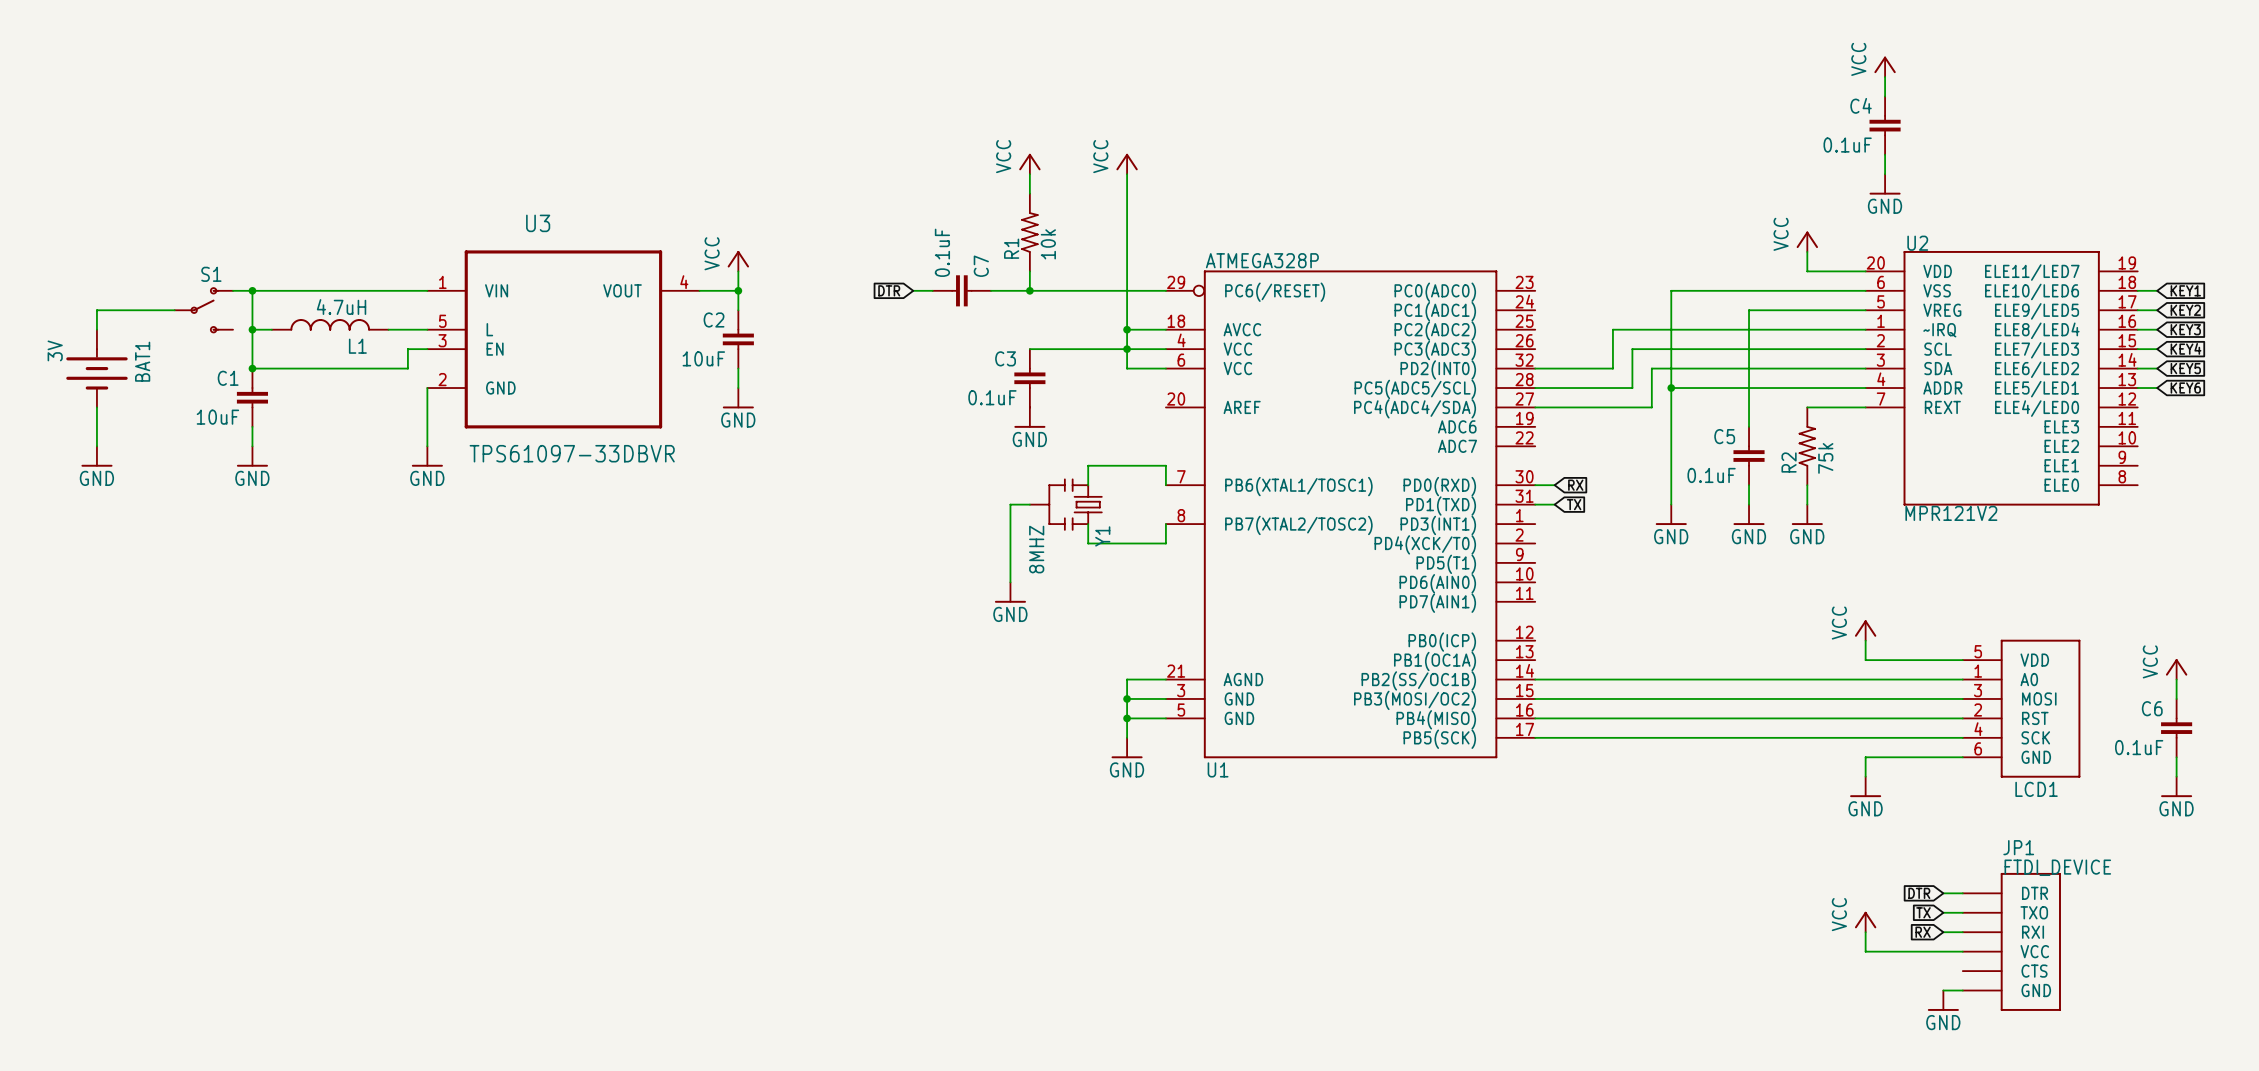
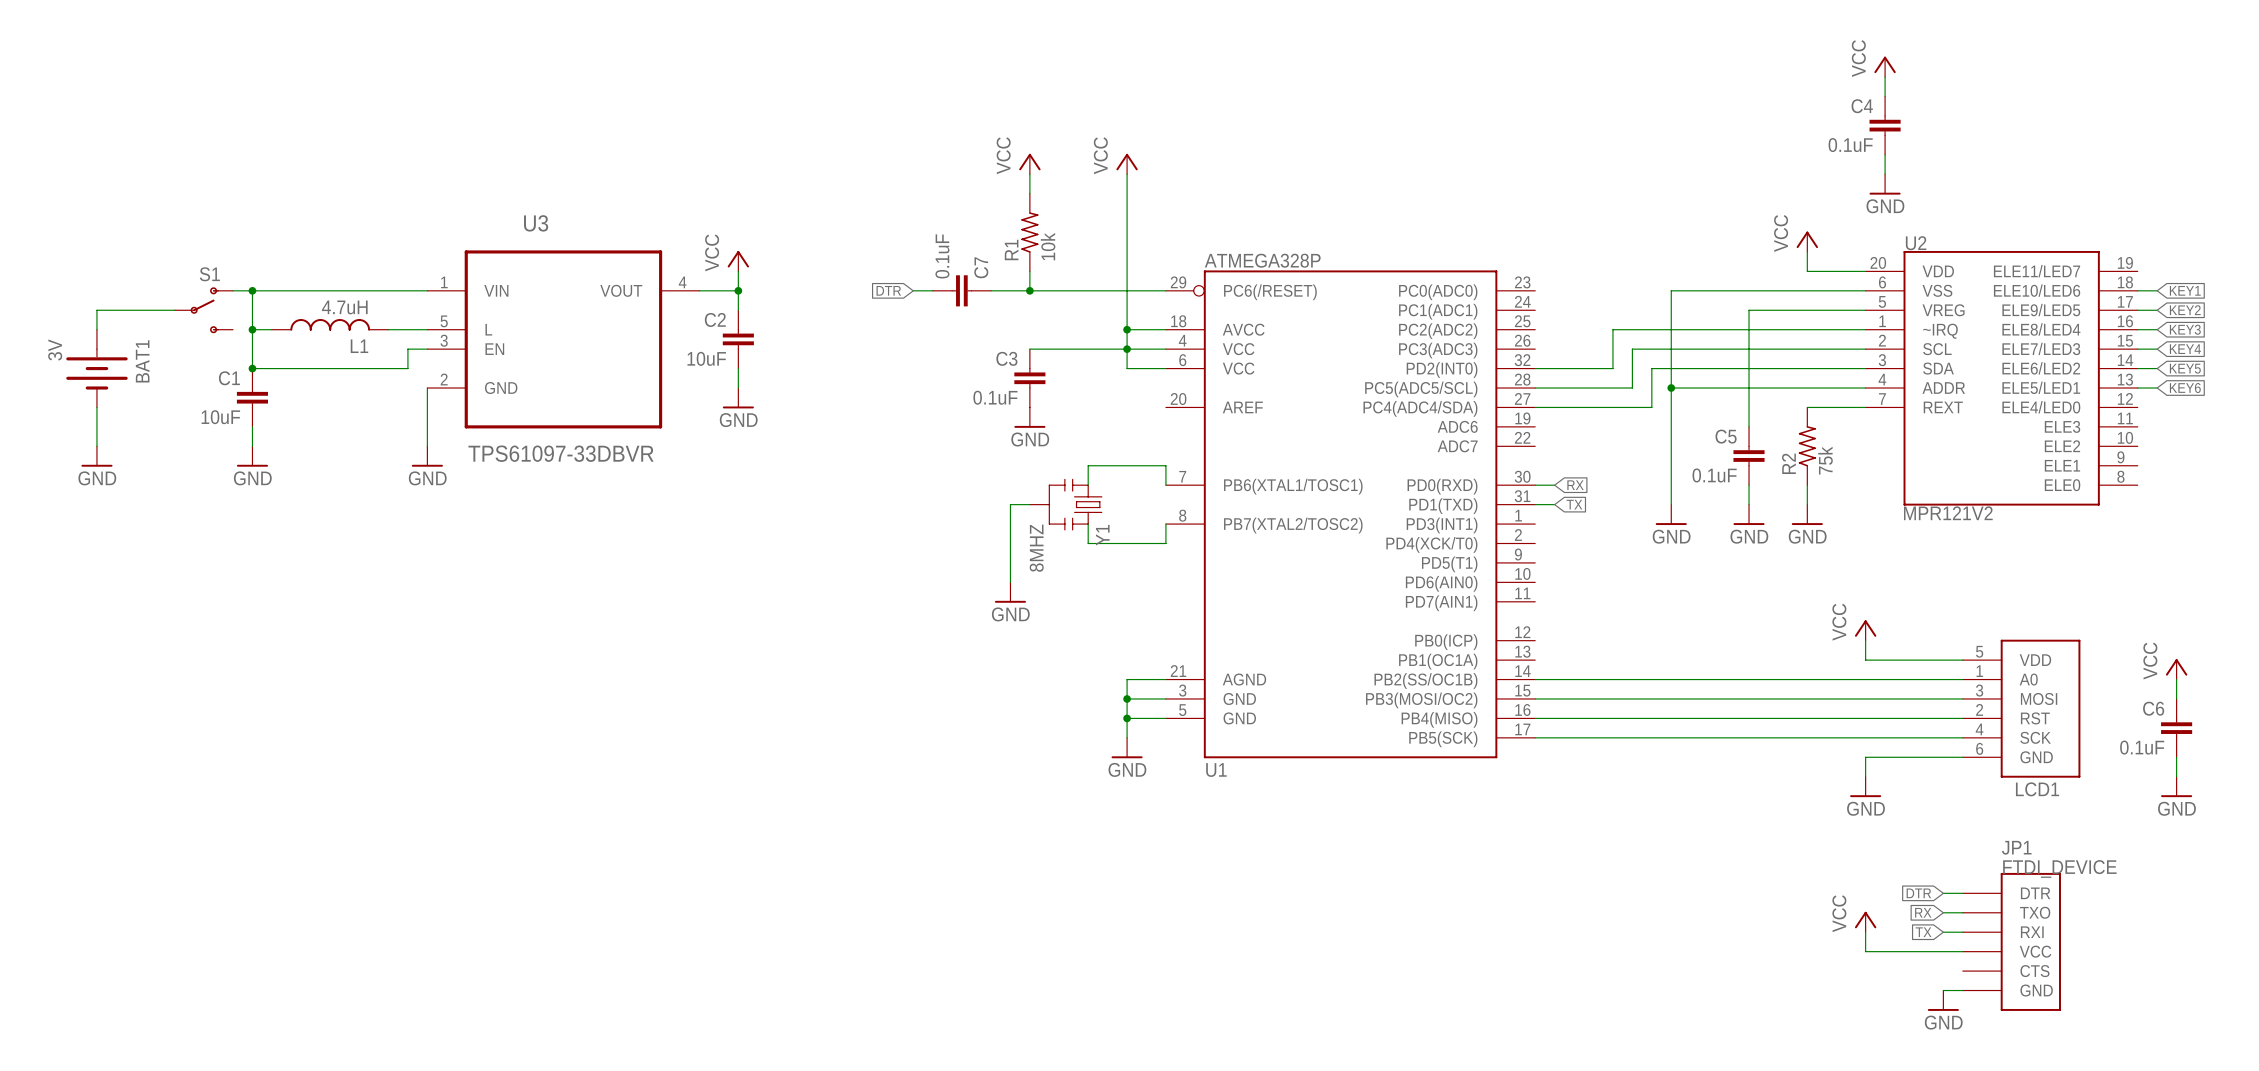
global label: TX (1923, 912) -> RX (1923, 912)
global label: RX (1923, 932) -> TX (1923, 932)

